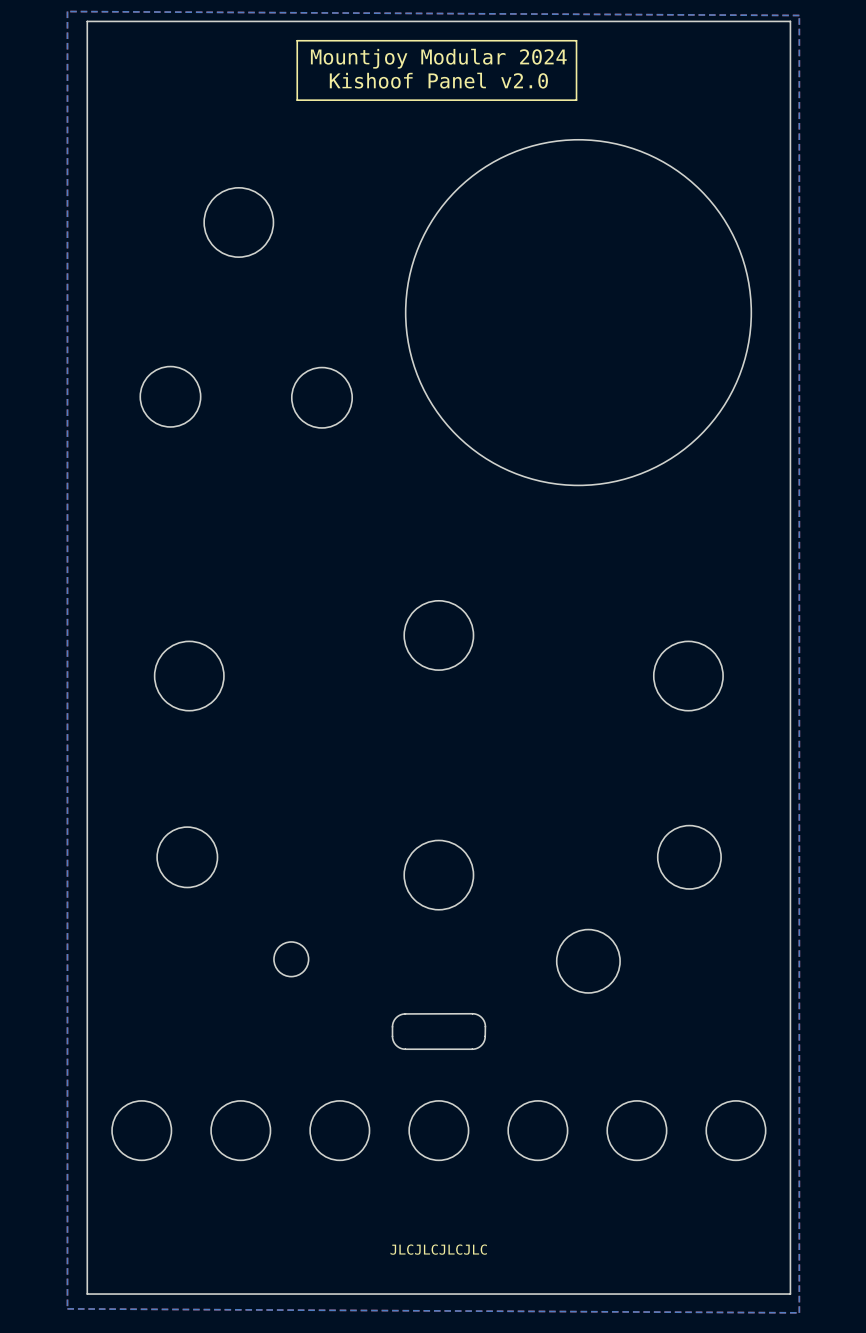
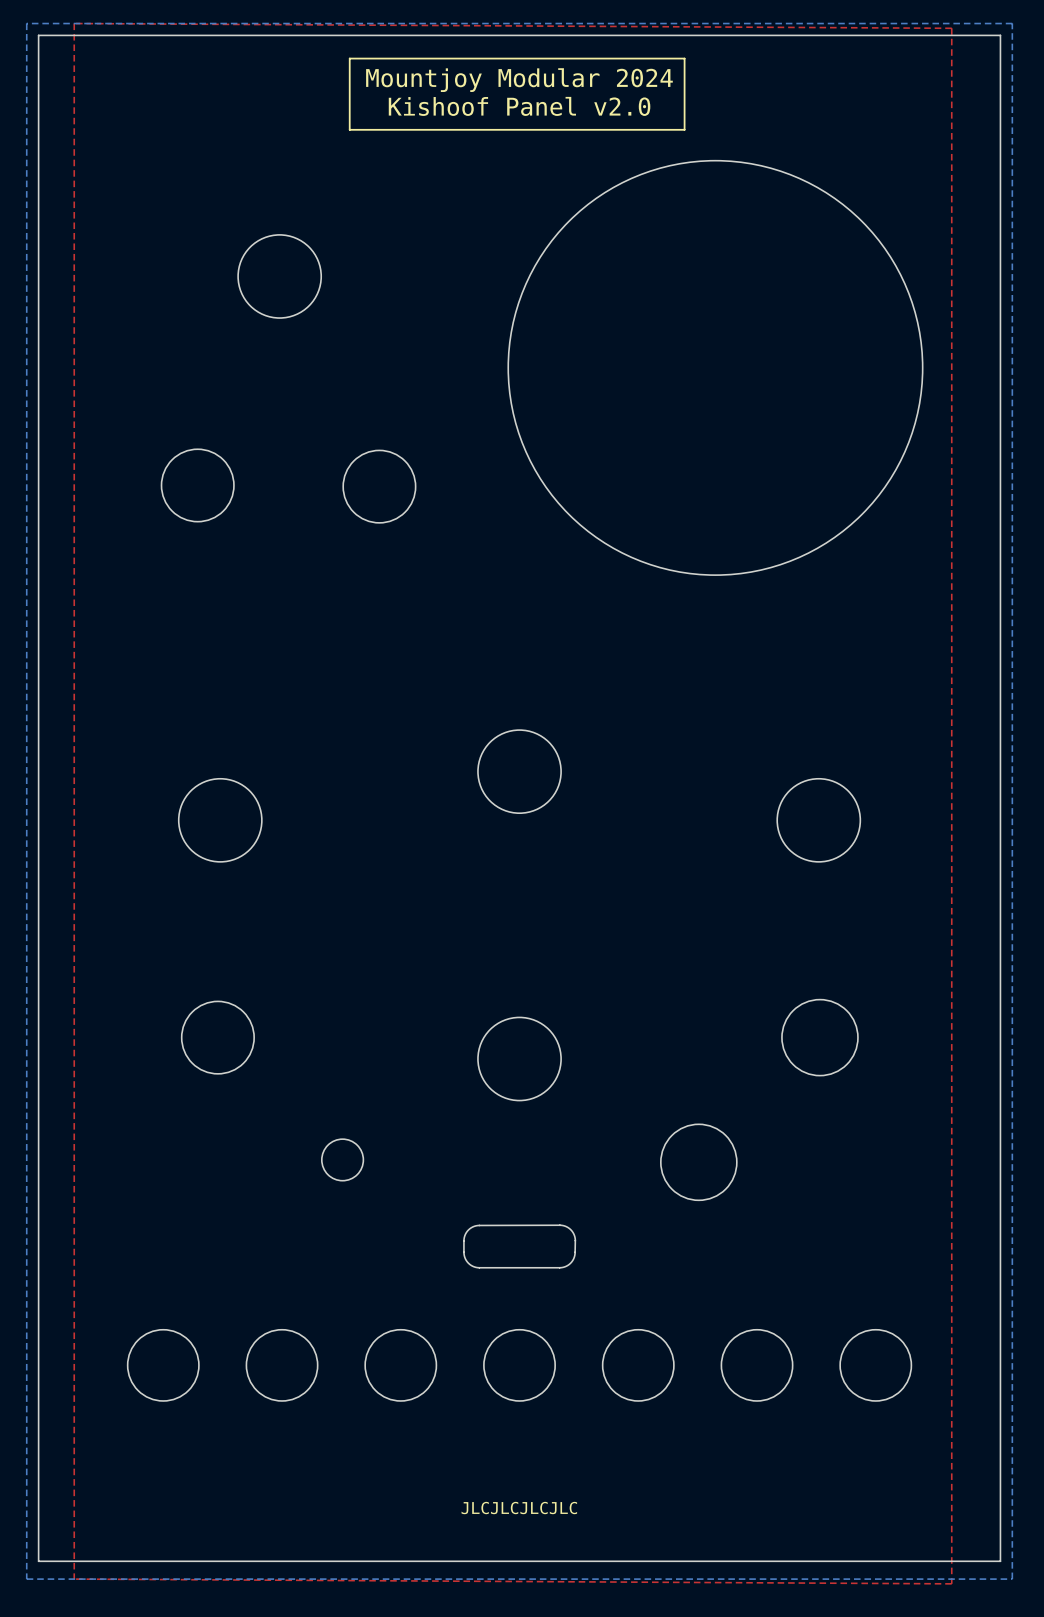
bottom zone outline: (67, 11) (799, 15) (799, 1312) (67, 1308) (67, 11) -> (1012, 23) (1012, 1579) (26, 1579) (26, 23) (1012, 23)
board edge: (87, 21) (87, 1294) -> (97, 35) (38, 35) (38, 1561) (97, 1561)
board edge: (790, 21) (790, 1294) -> (941, 35) (1000, 35) (1000, 1561) (941, 1561)
round board edge position: (578, 312) -> (715, 367)

